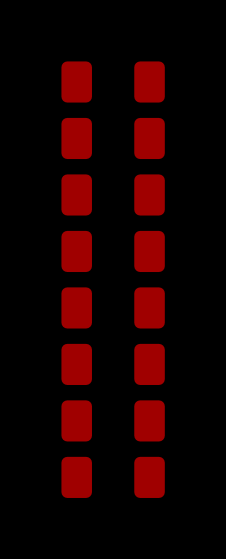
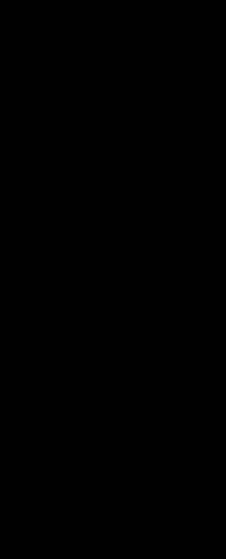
part: (113, 81) -> none
part: (113, 138) -> none
part: (113, 194) -> none
part: (113, 251) -> none
part: (113, 307) -> none
part: (113, 364) -> none
part: (113, 420) -> none
part: (113, 477) -> none

